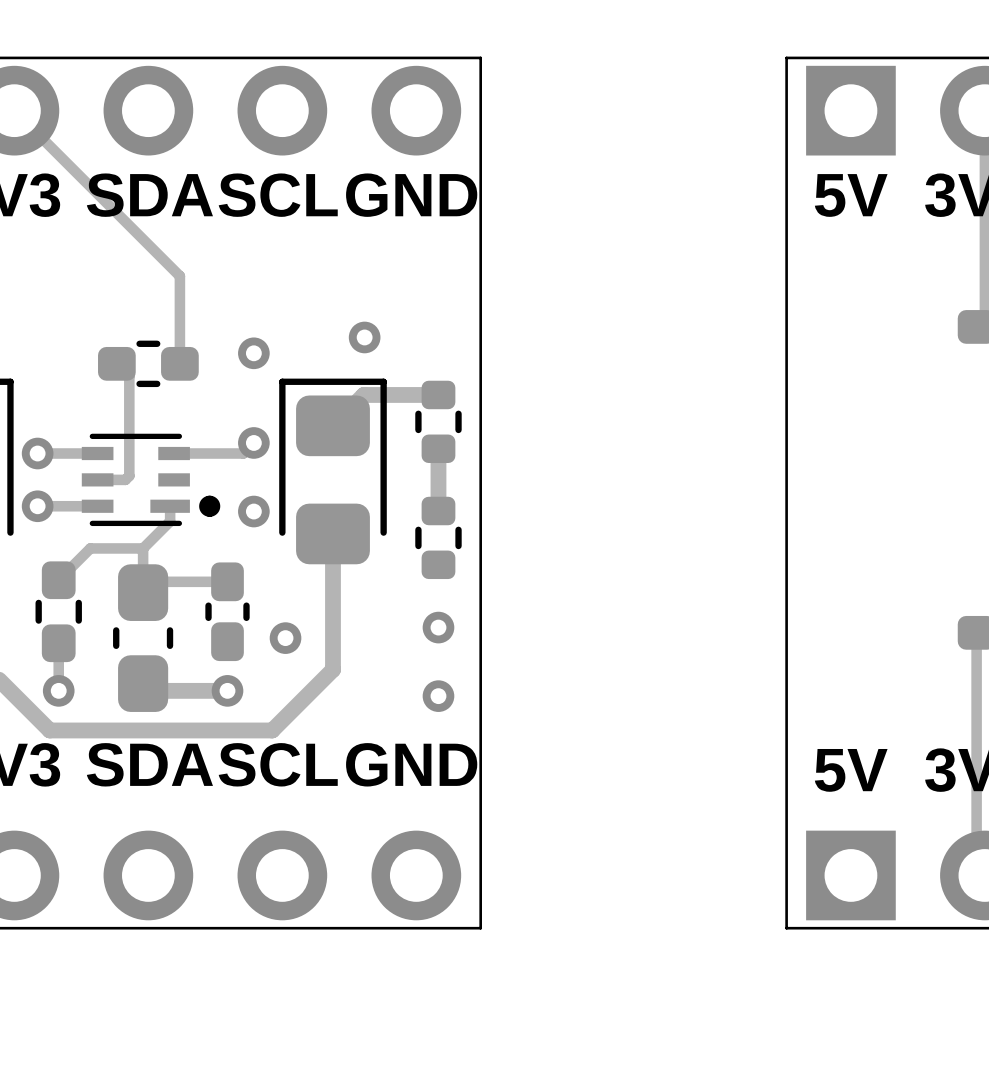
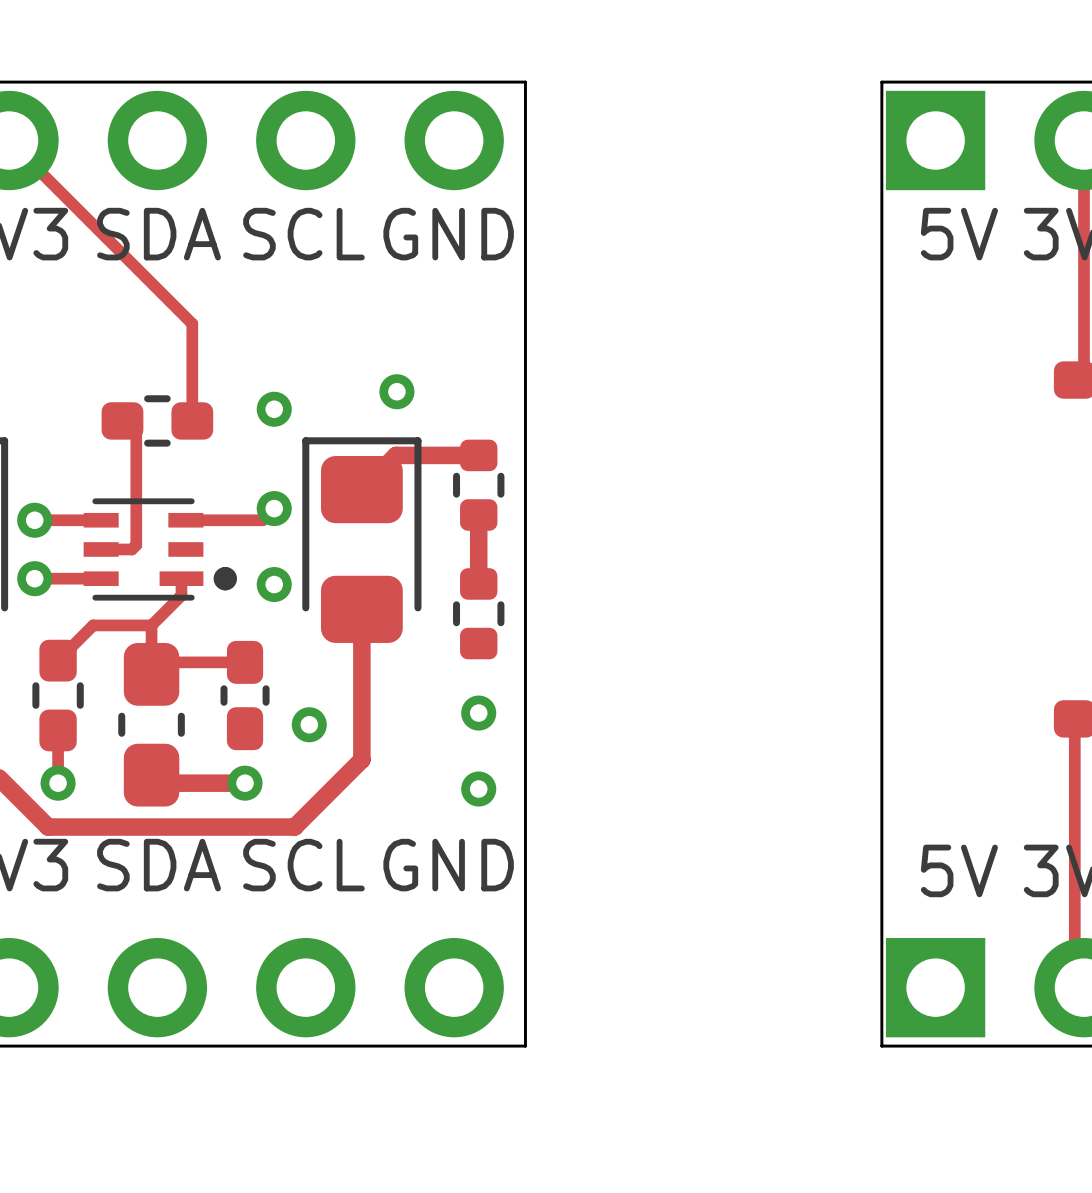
board edge: (802, 57) (786, 57) (786, 928) (802, 928) -> (881, 82) (881, 1046)
text position: 5V (851, 195) -> 5V (959, 234)
text position: 5V (851, 770) -> 5V (959, 870)

